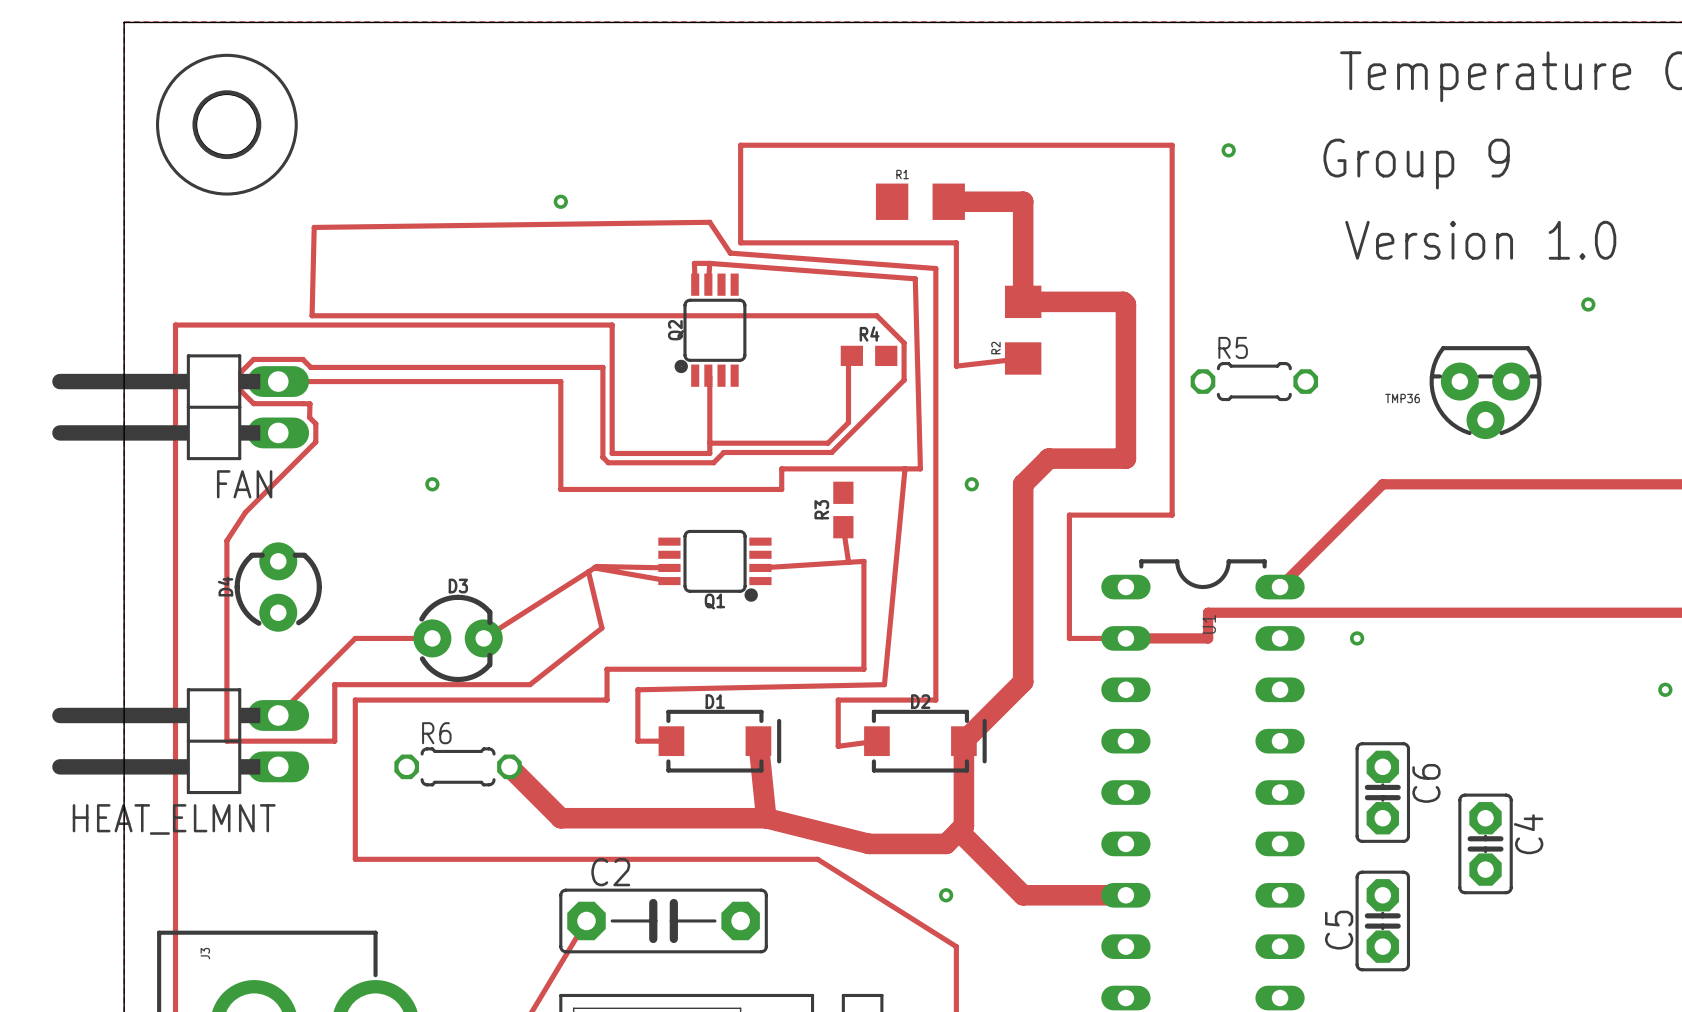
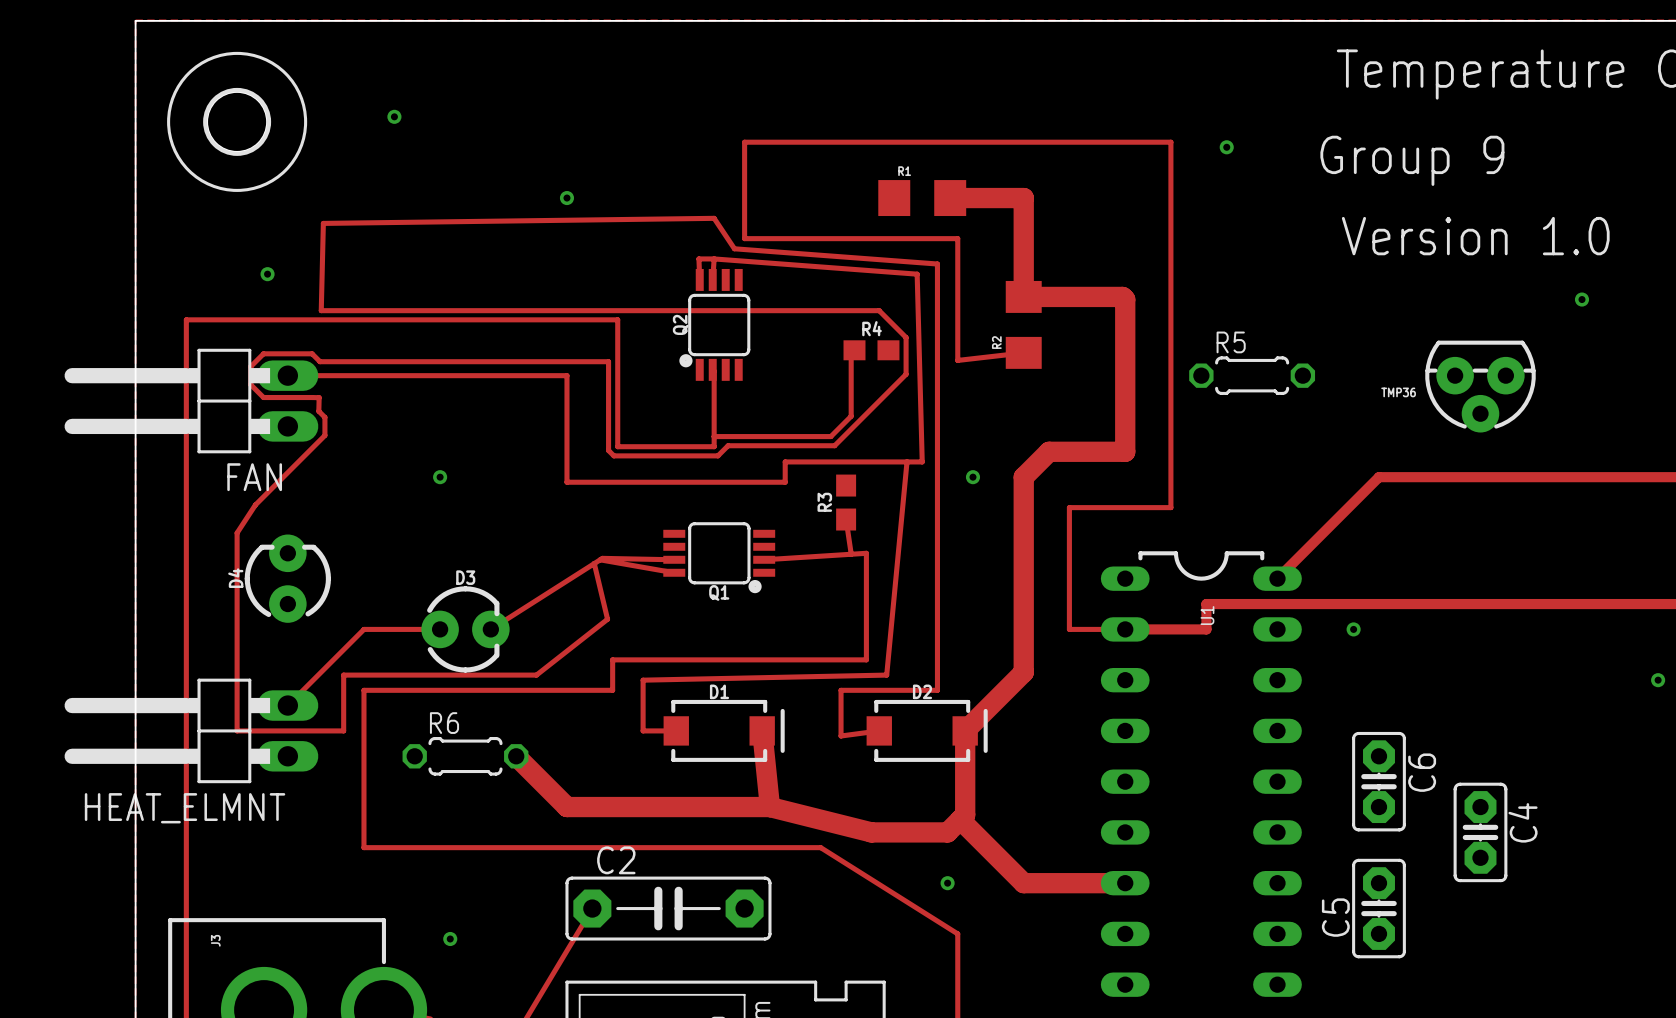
via: none -> (394, 116)
via: none -> (267, 274)
via: none -> (450, 939)

